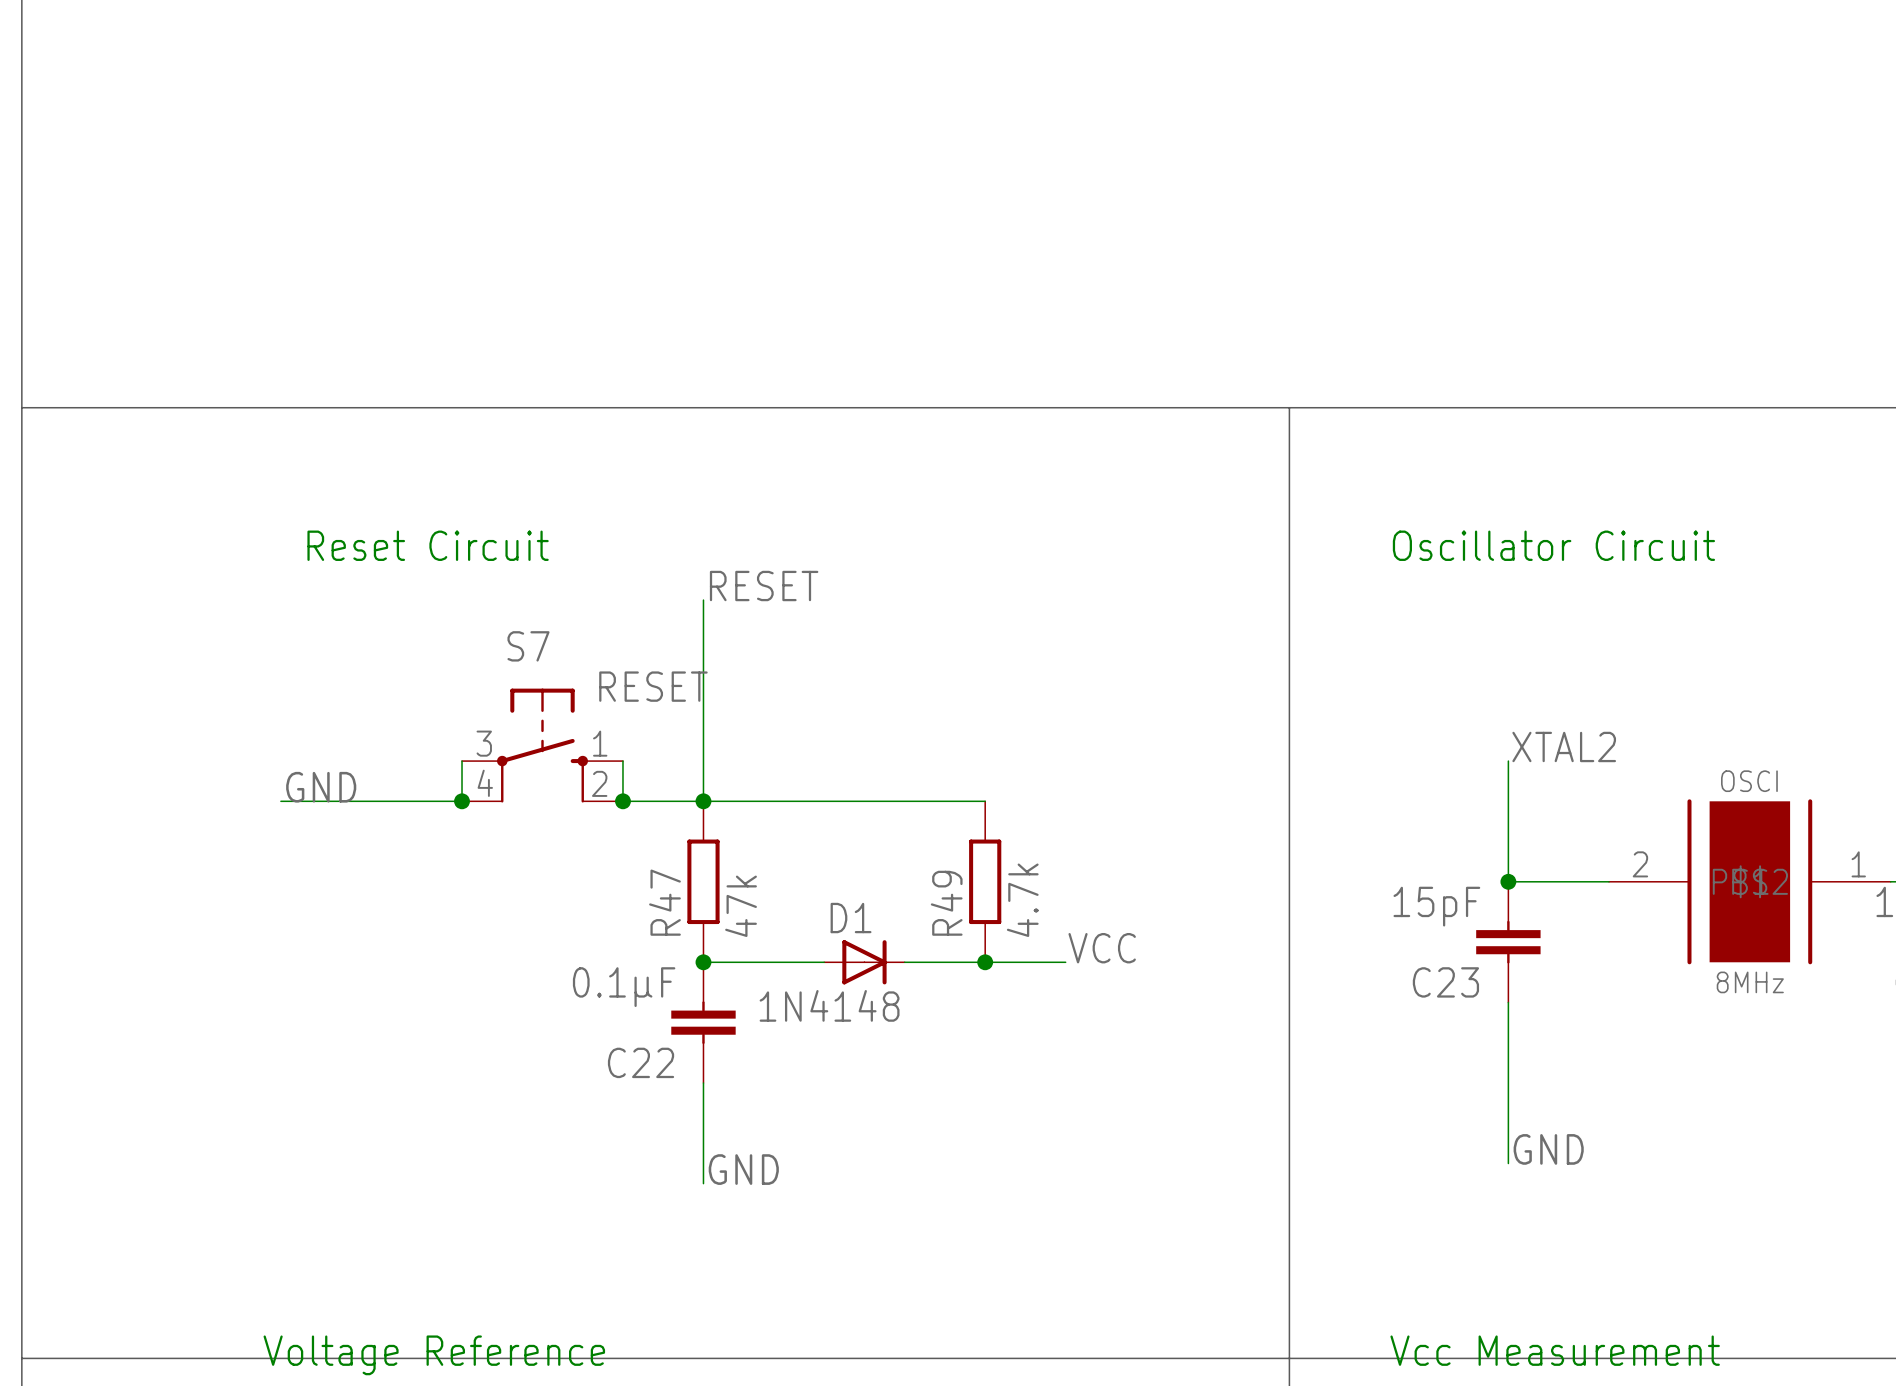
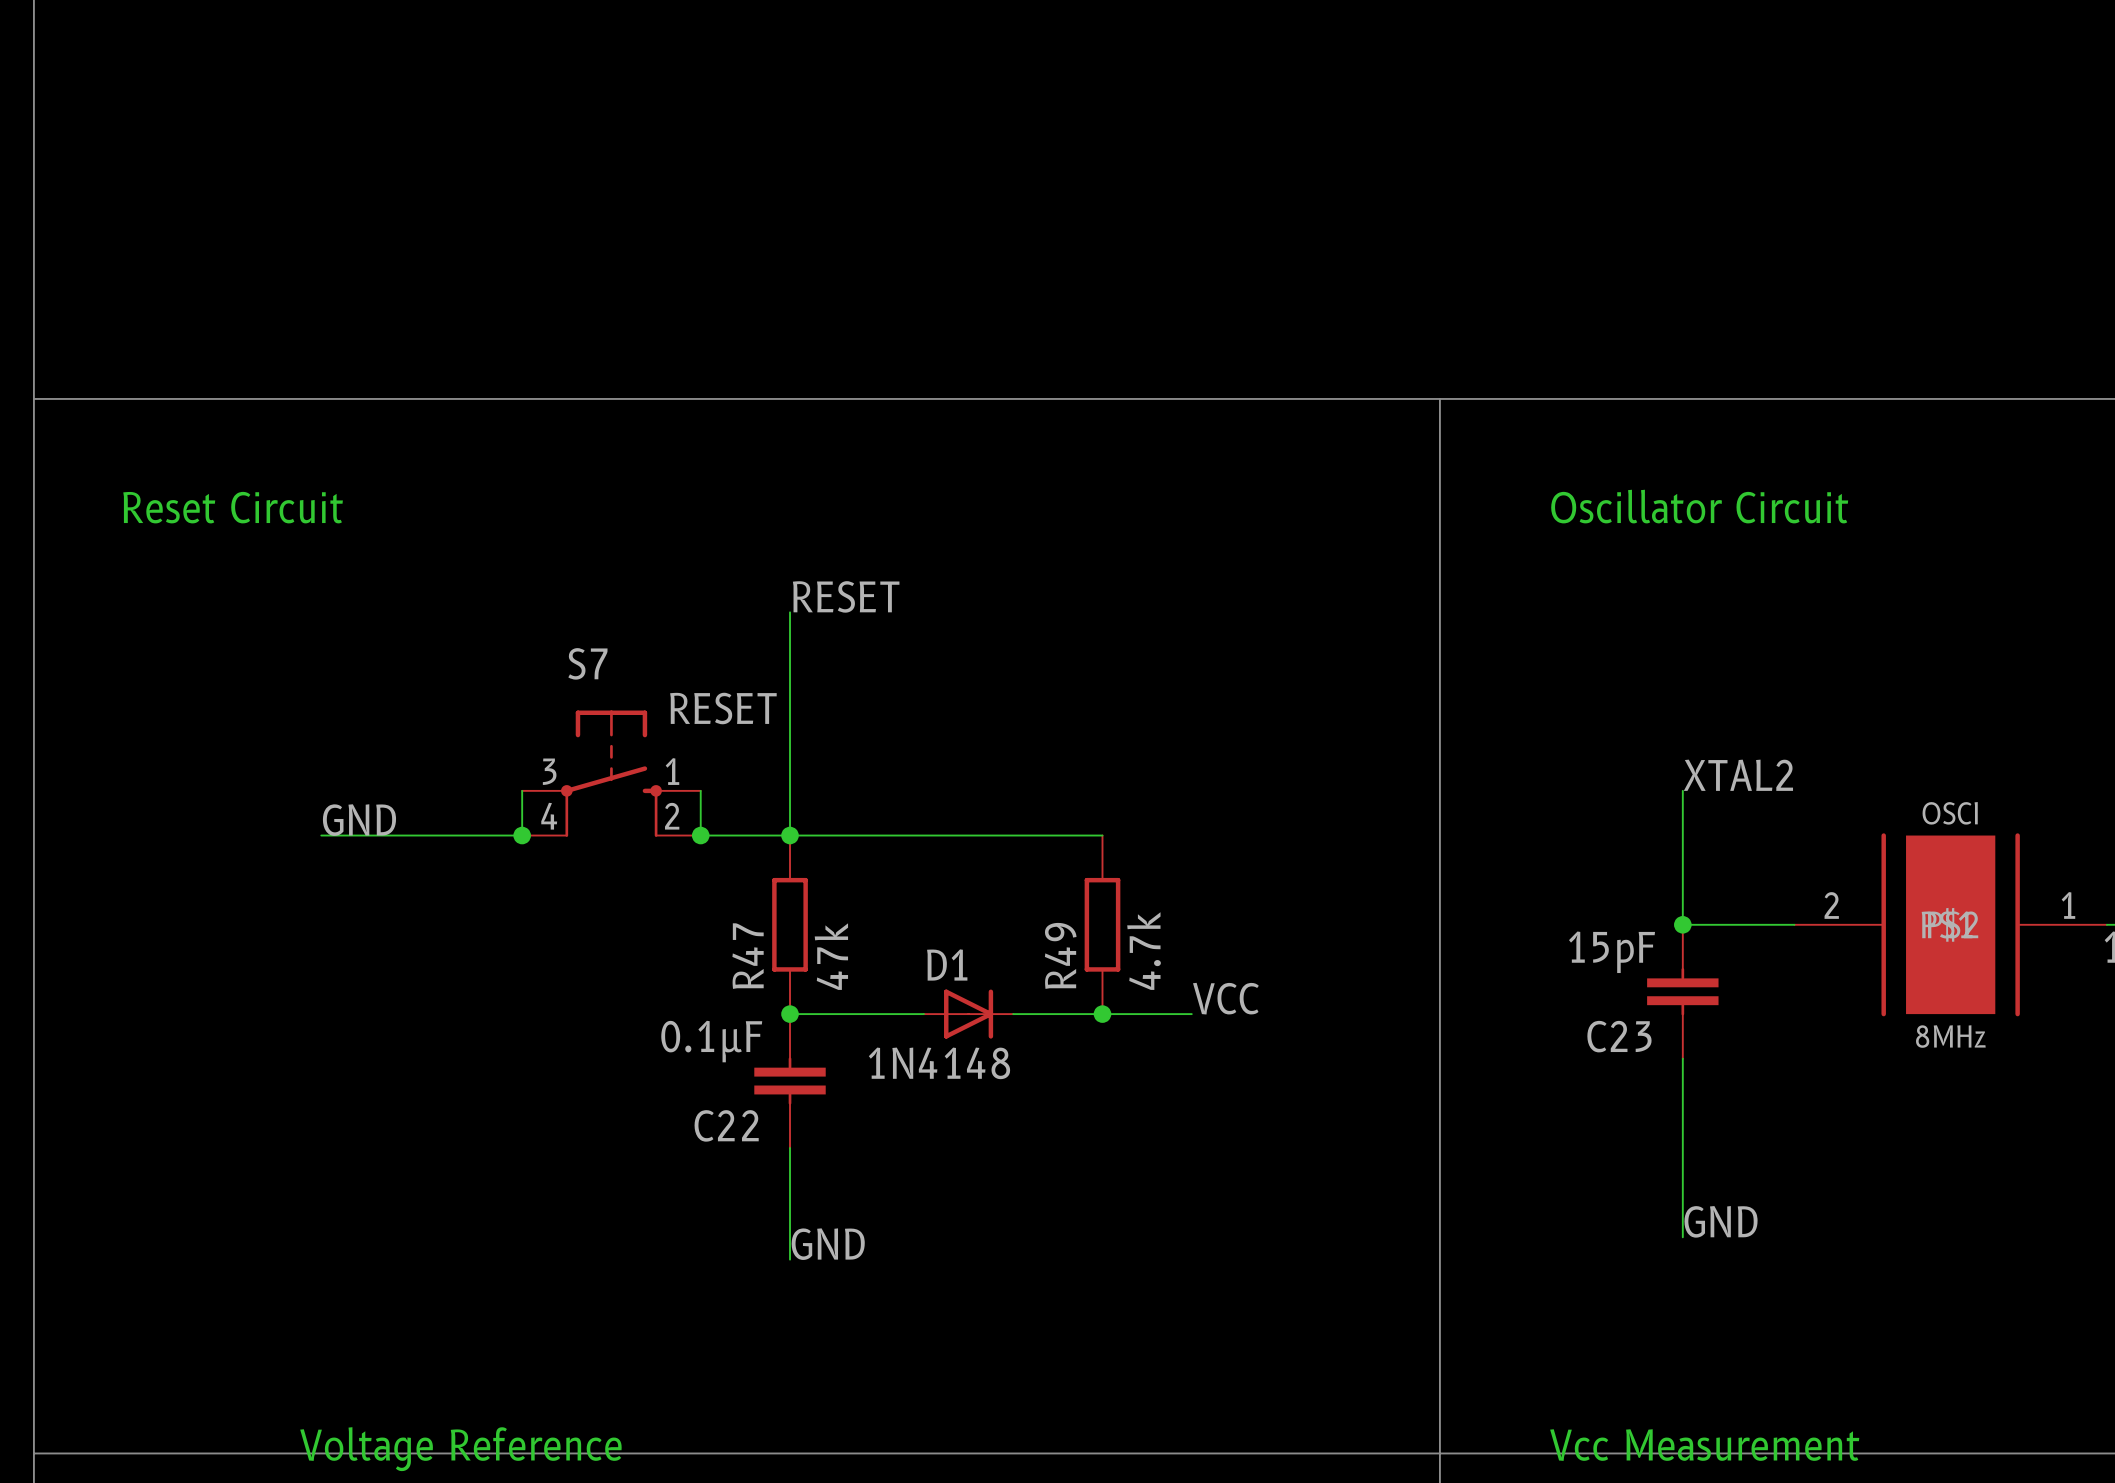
text position: Reset Circuit (428, 545) -> Reset Circuit (233, 507)
text position: Oscillator Circuit (1553, 545) -> Oscillator Circuit (1699, 506)

